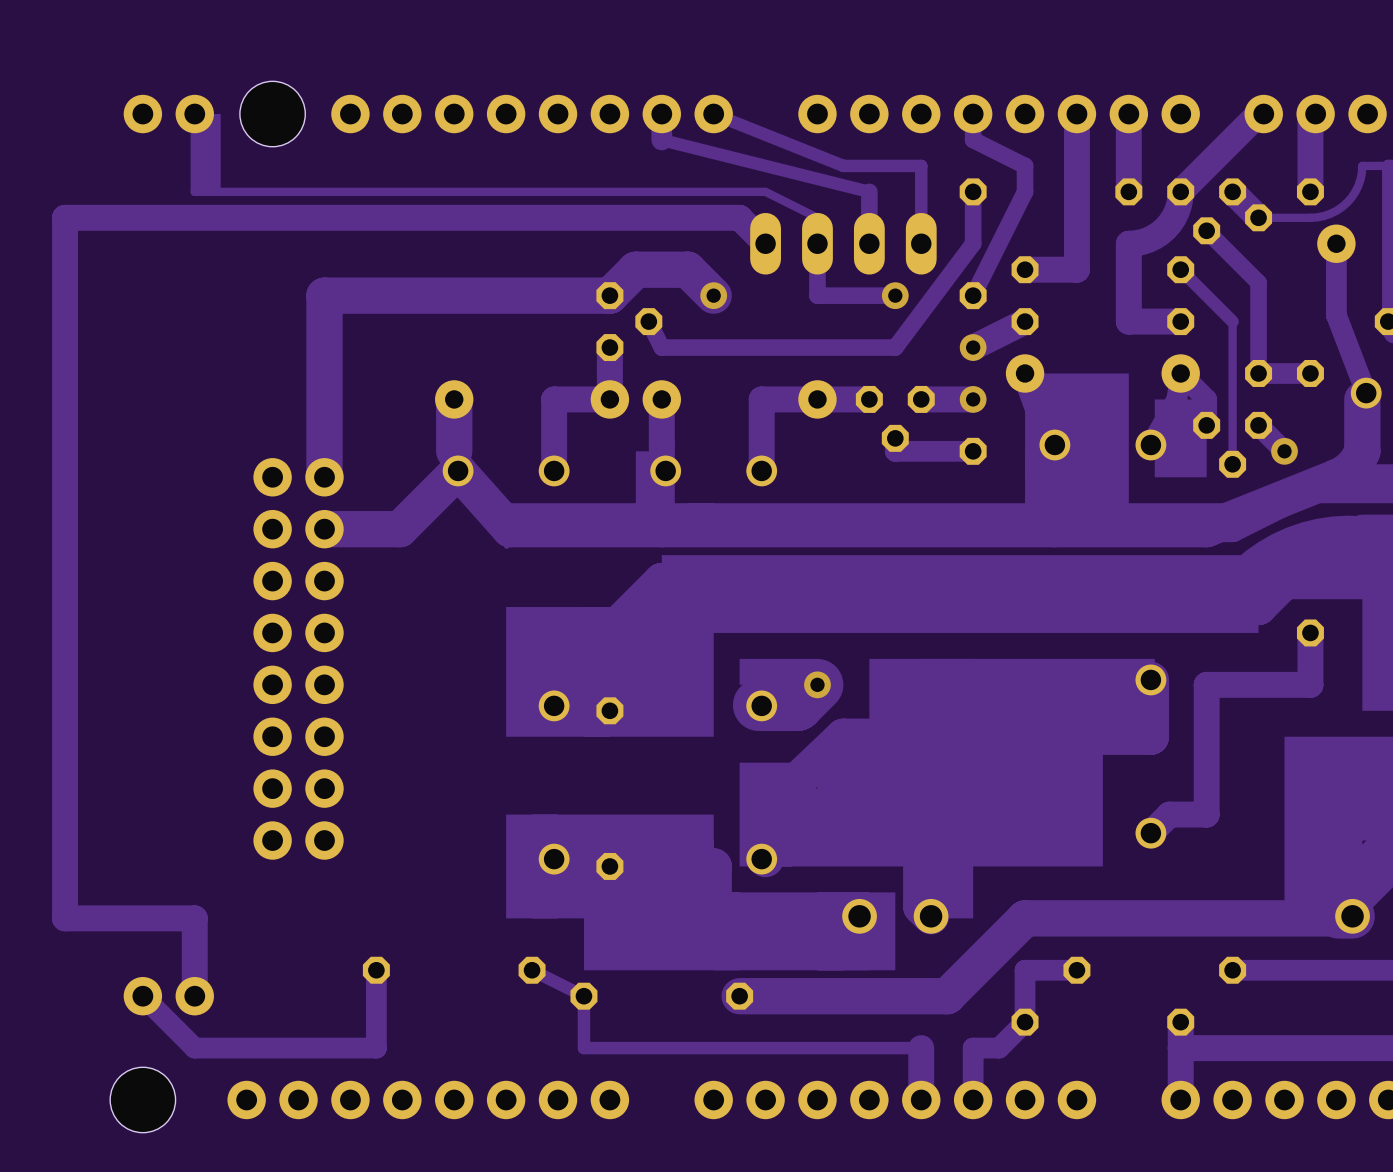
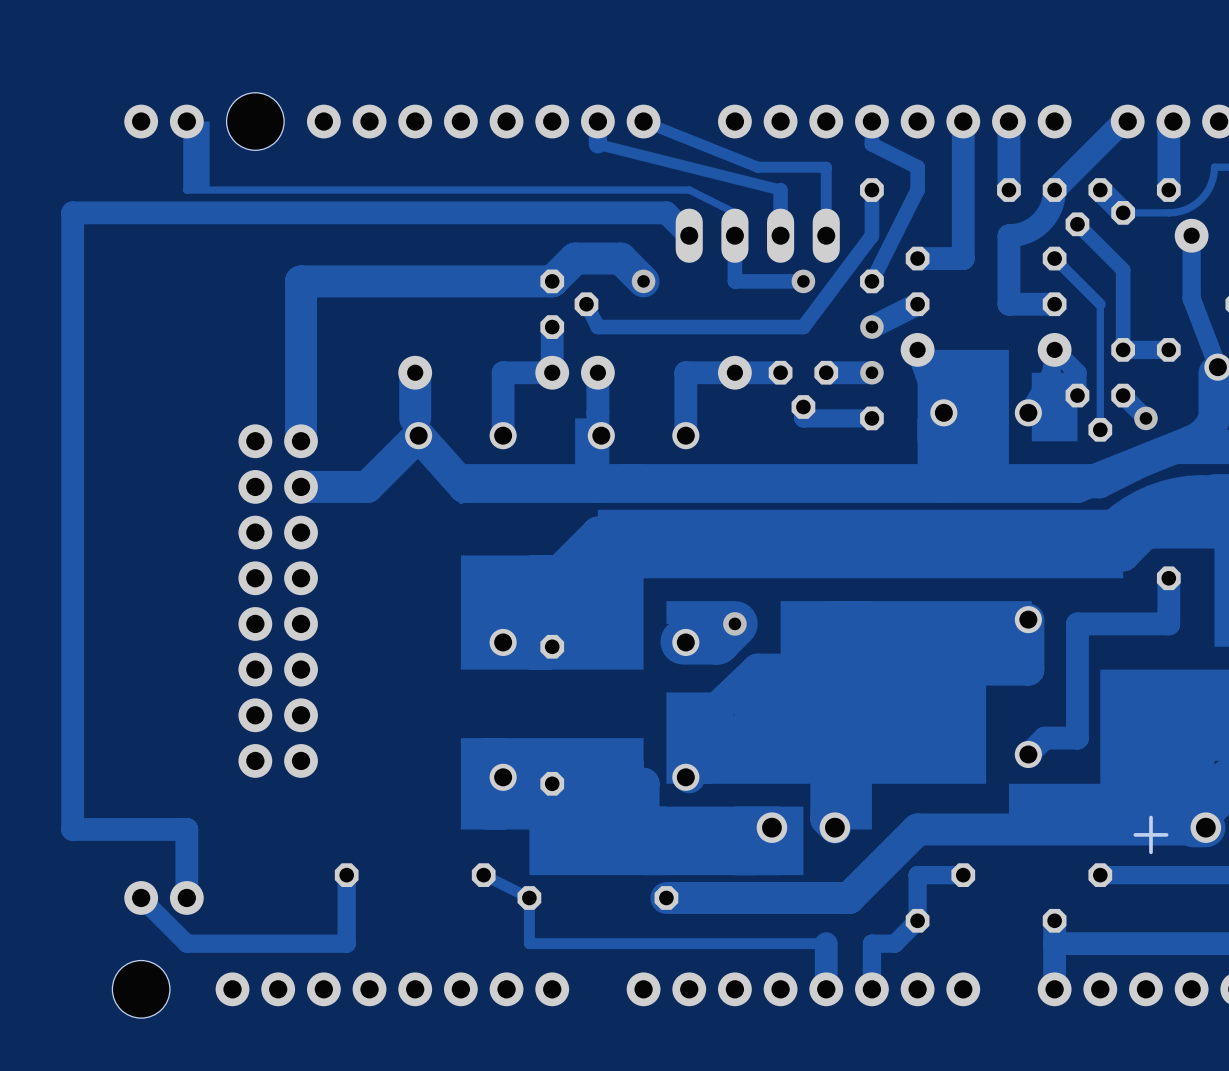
drawing: none -> [1008, 669, 1169, 830]
text: none -> + (1150, 834)

